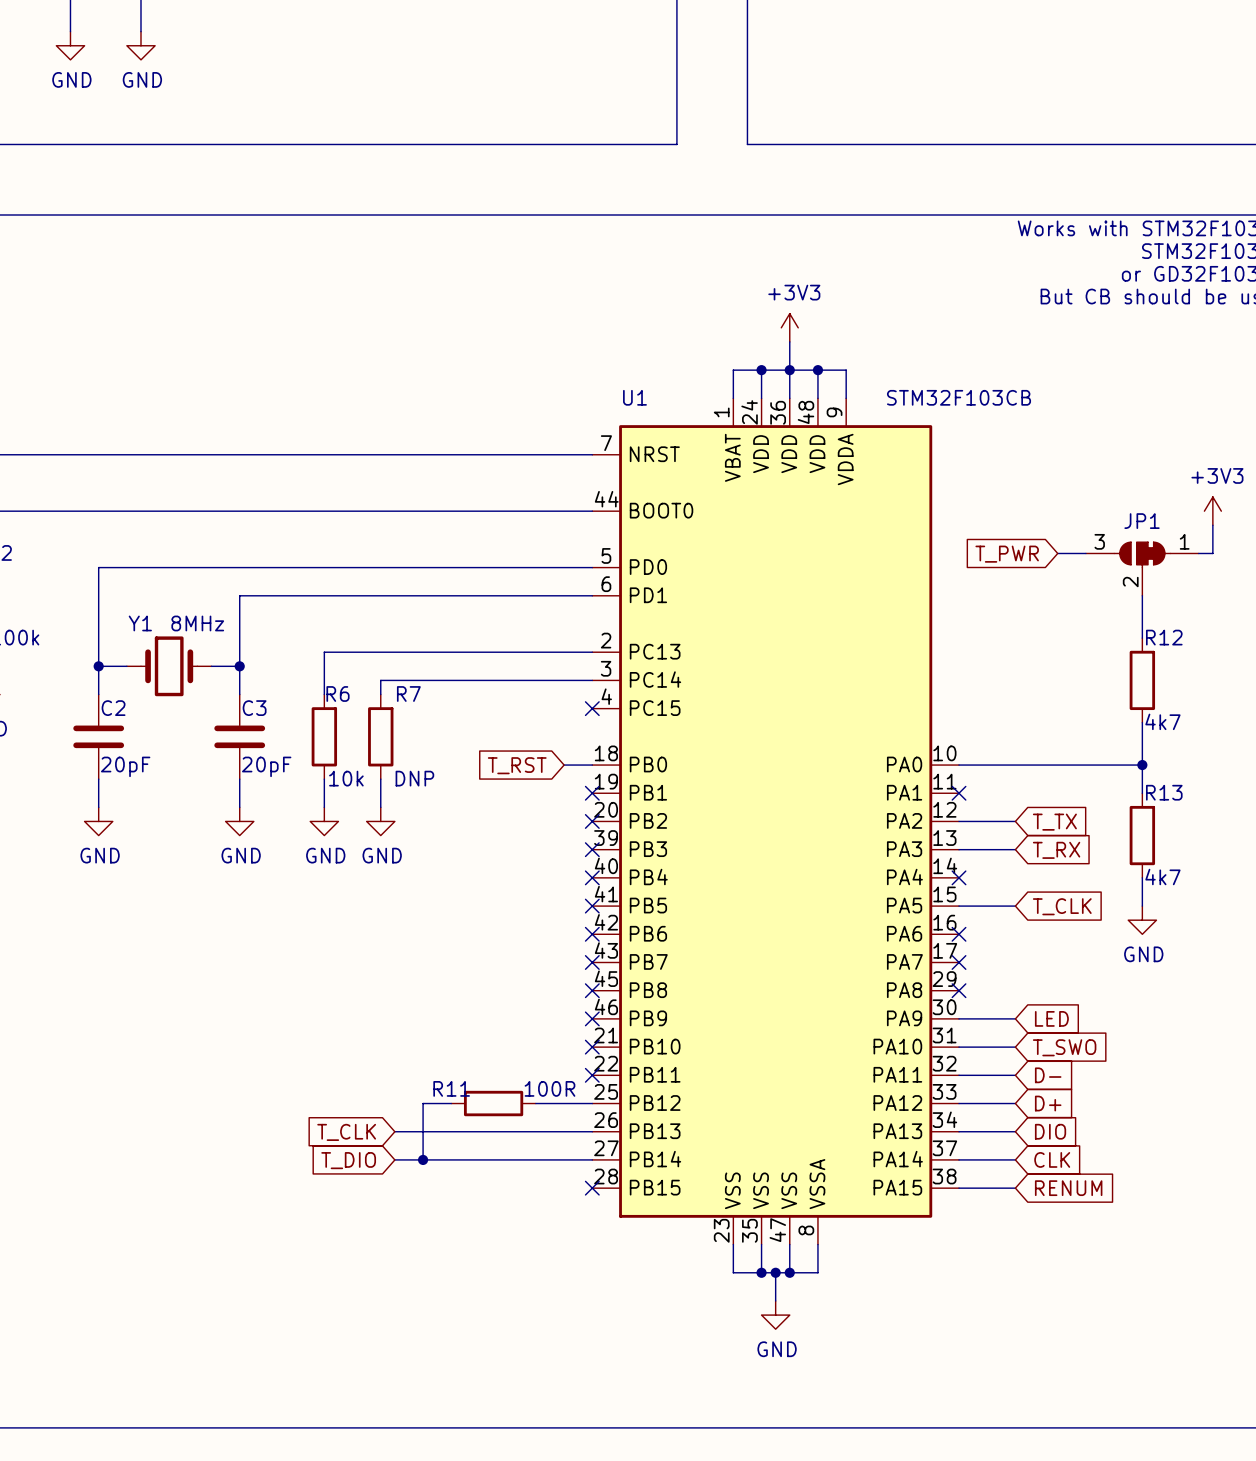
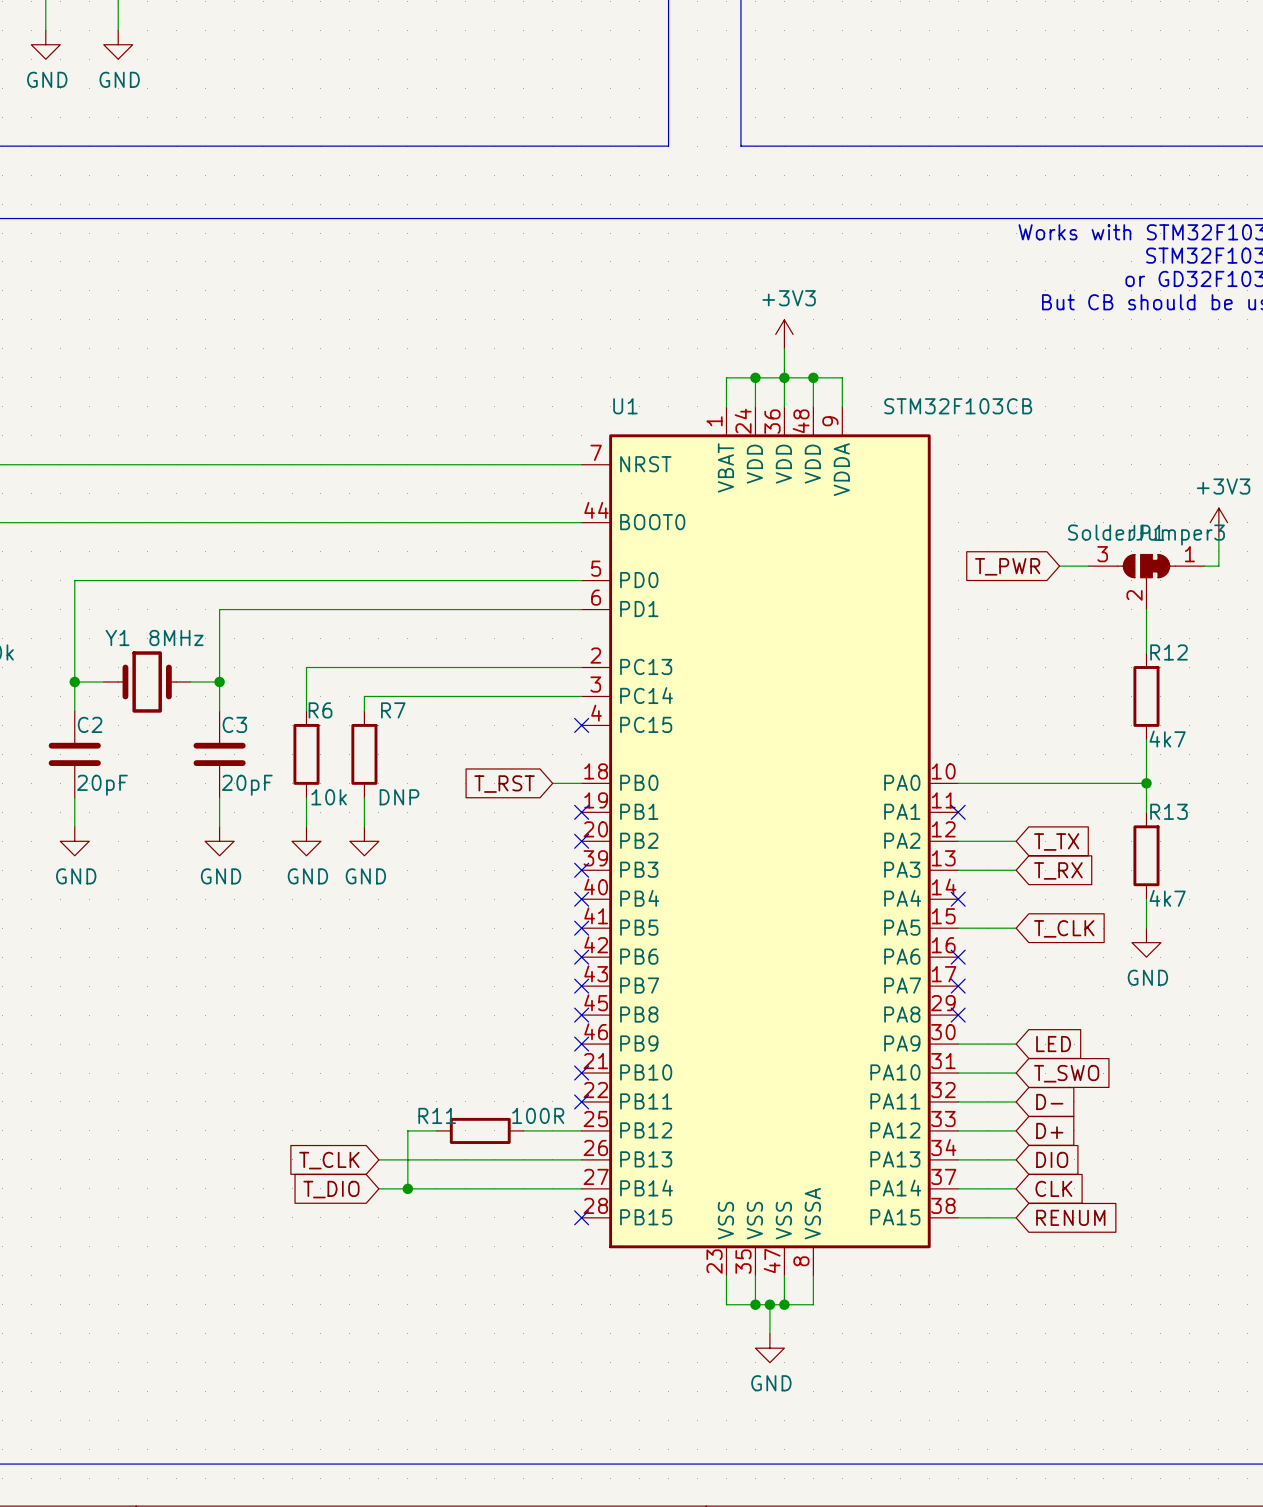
JP1 value: none -> SolderJumper3 (1146, 534)

